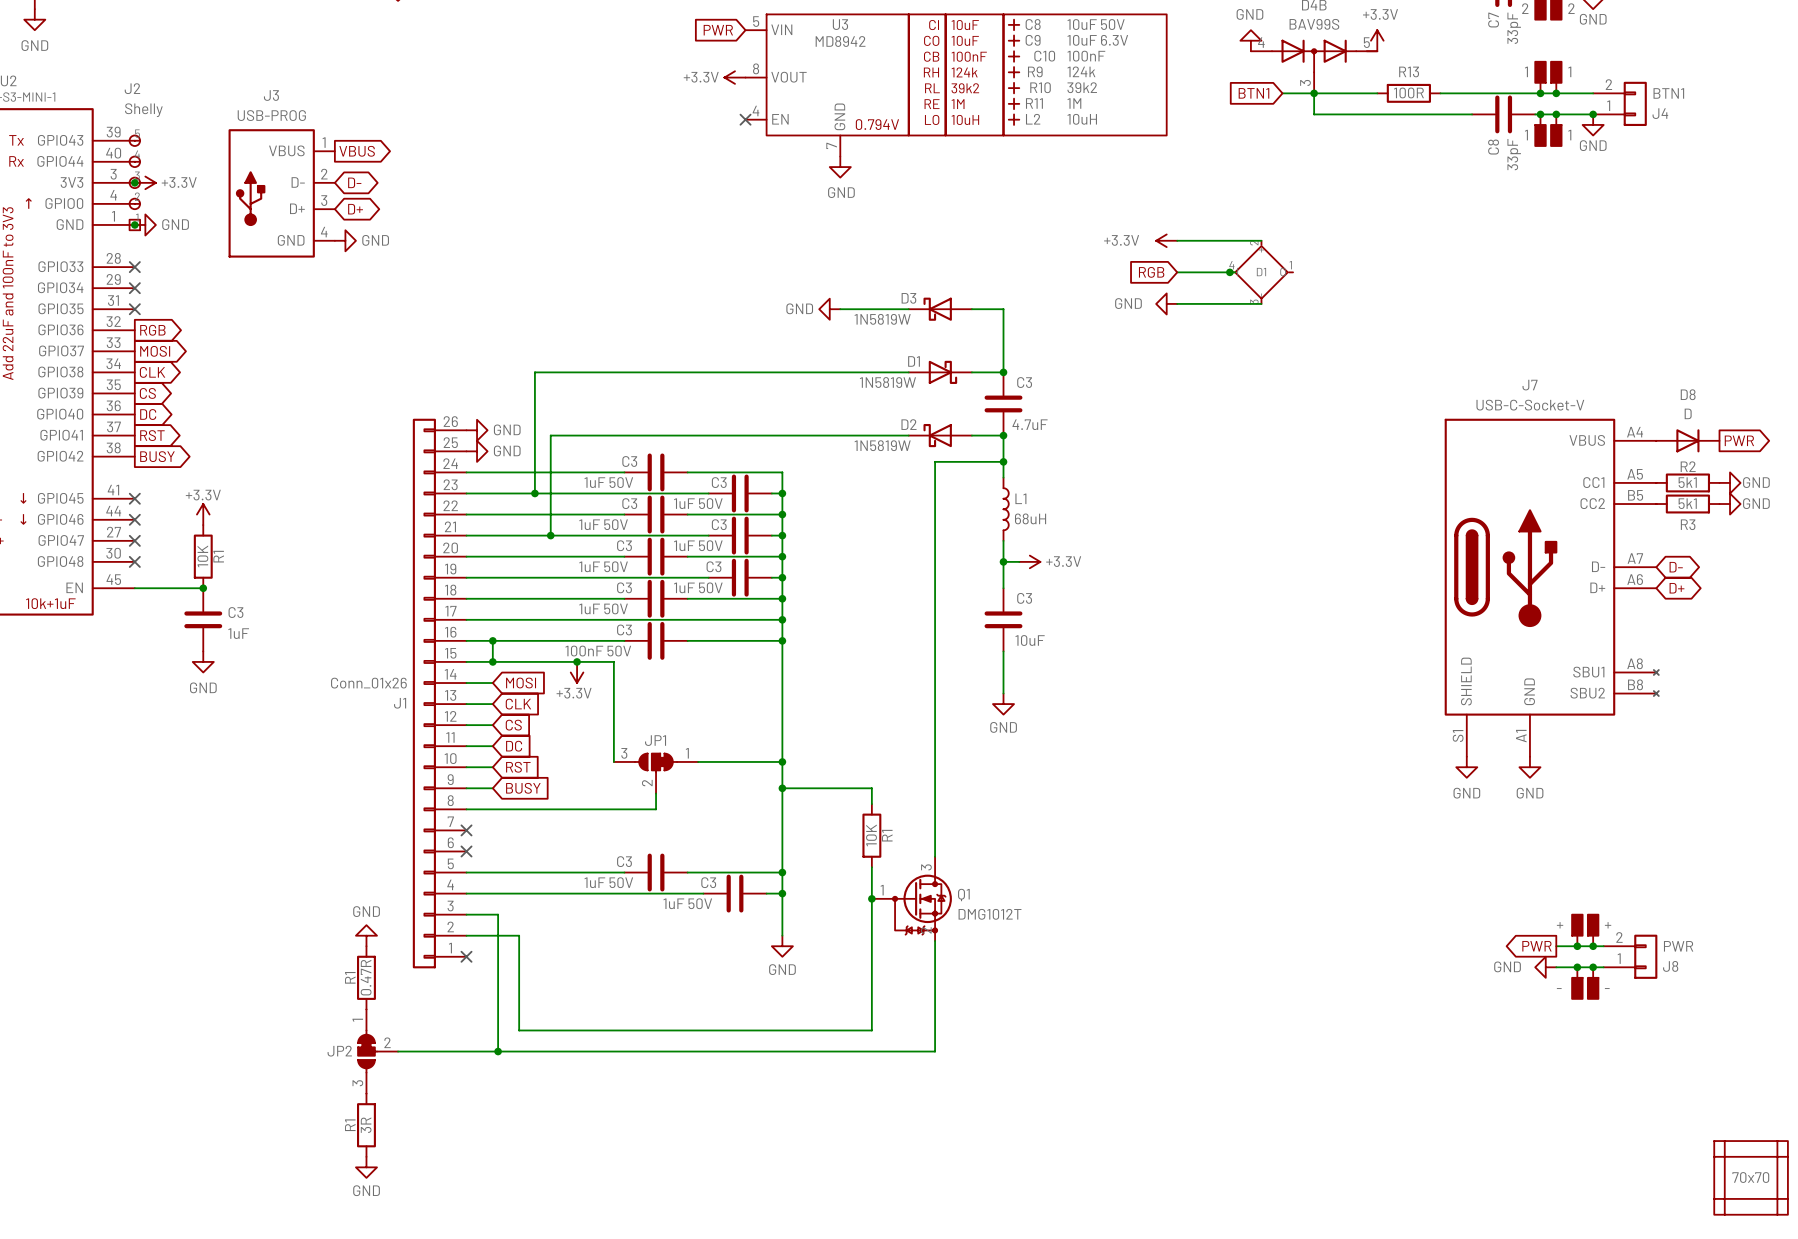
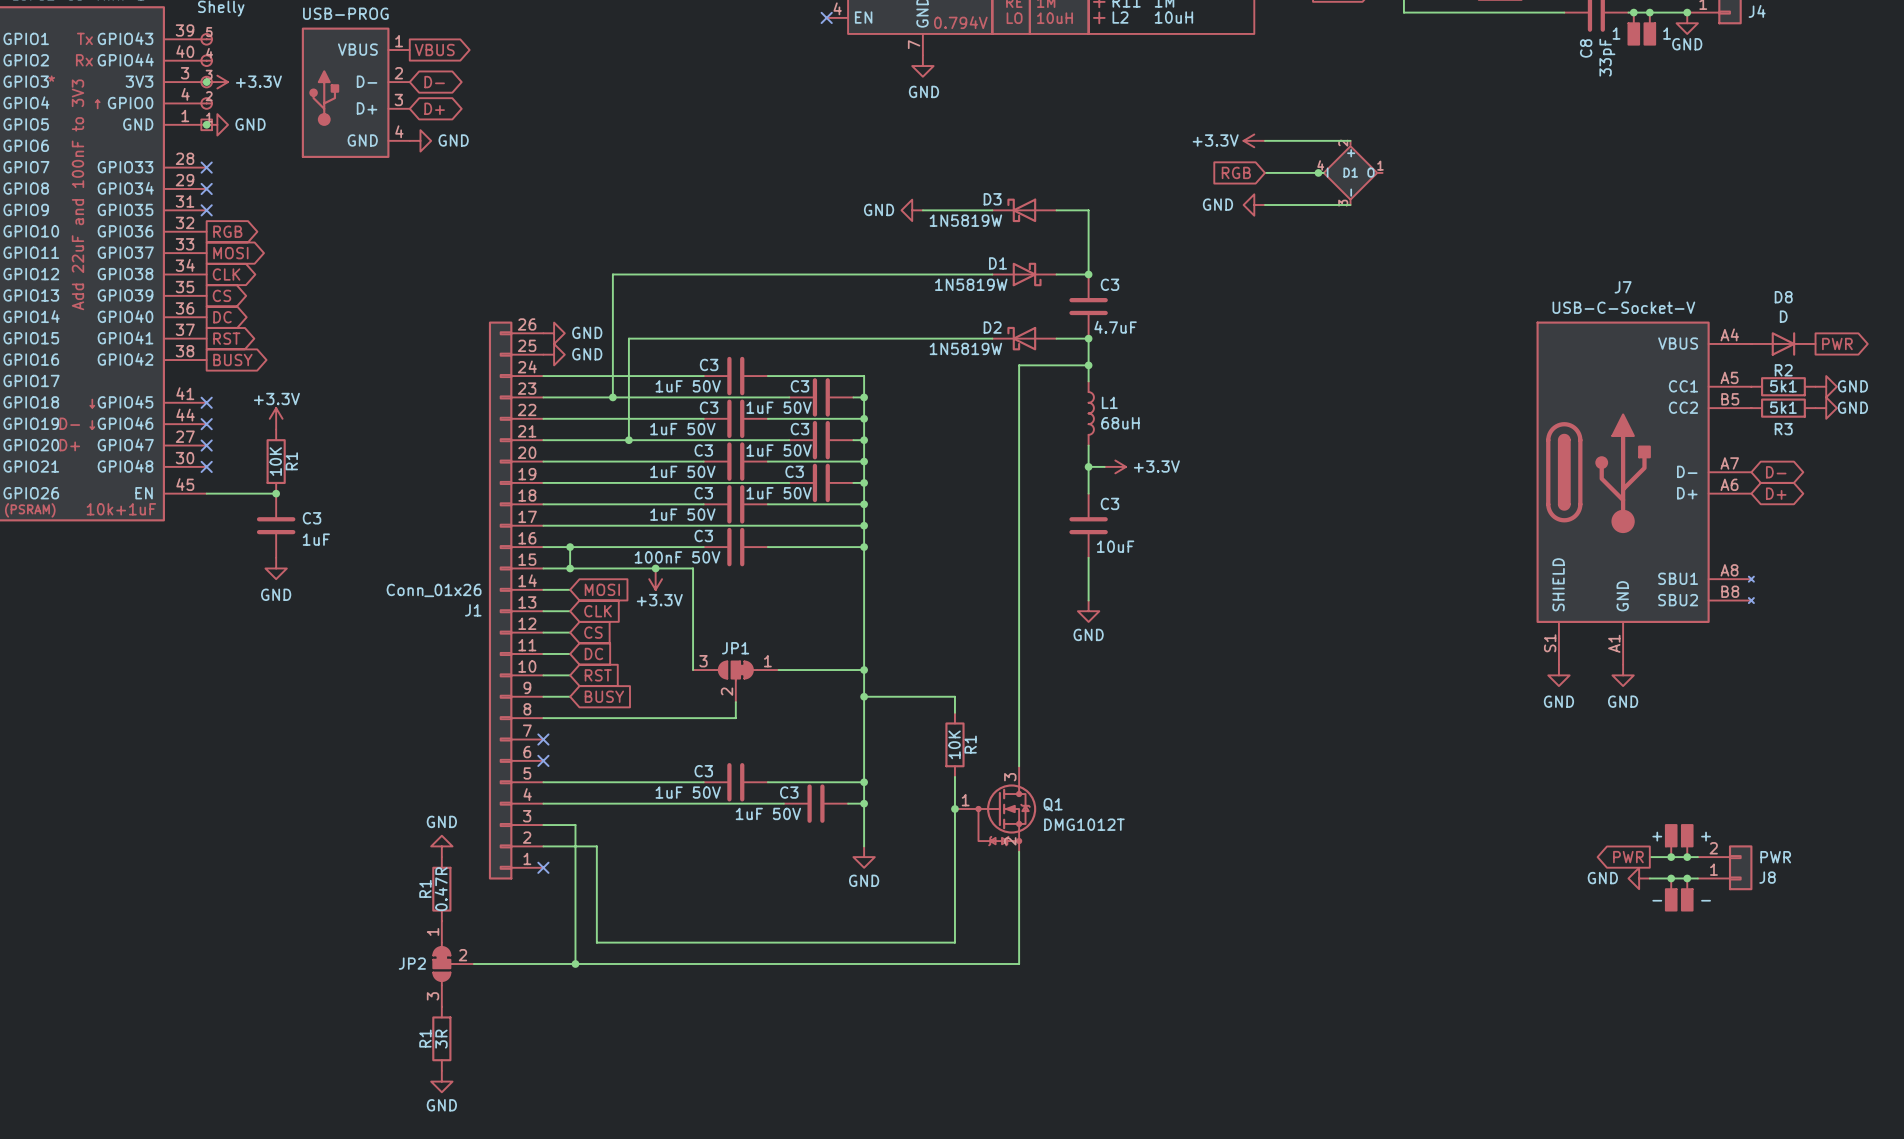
part: (1751, 1156) -> none
part: (1724, 1177) -> none
part: 70x70 (1751, 1177) -> none
part: (1777, 1177) -> none
part: (1751, 1198) -> none

